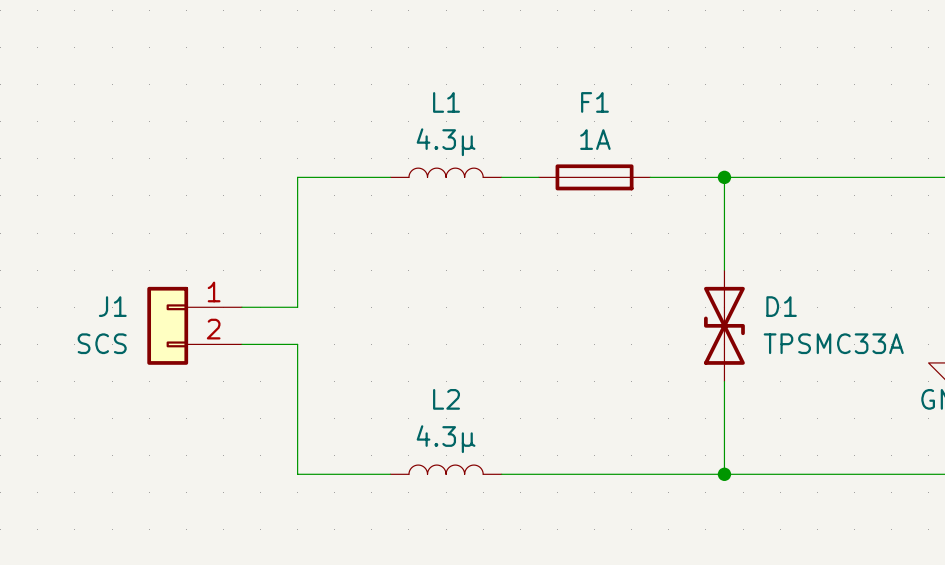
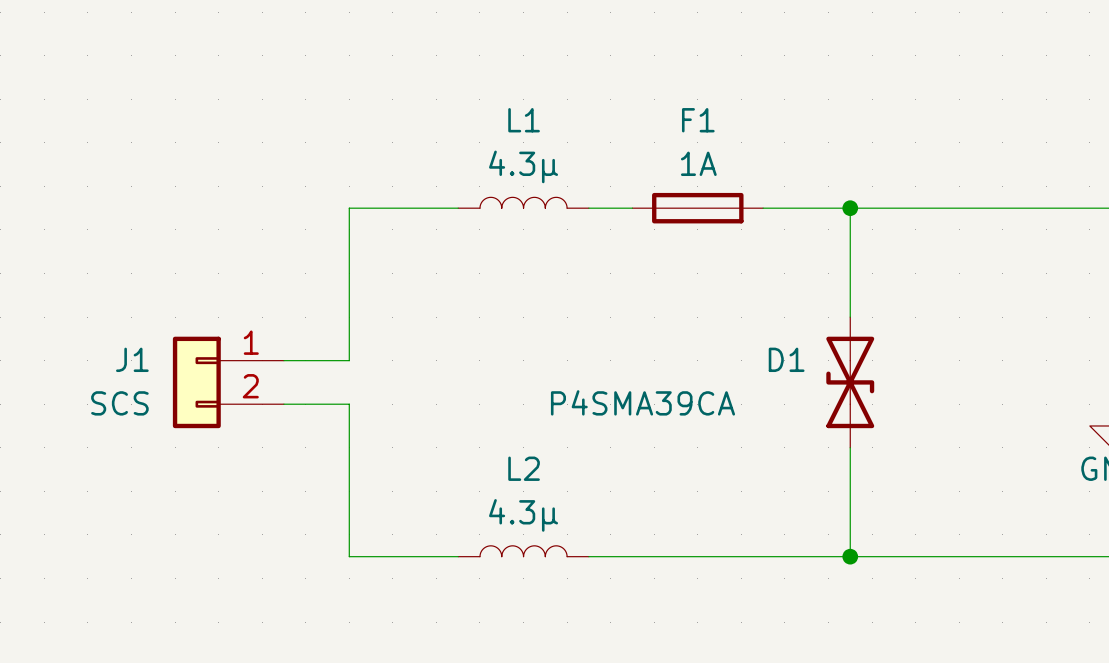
D1 name position: D1 (781, 306) -> D1 (786, 359)
D1 value: TPSMC33A (833, 343) -> P4SMA39CA (642, 402)

